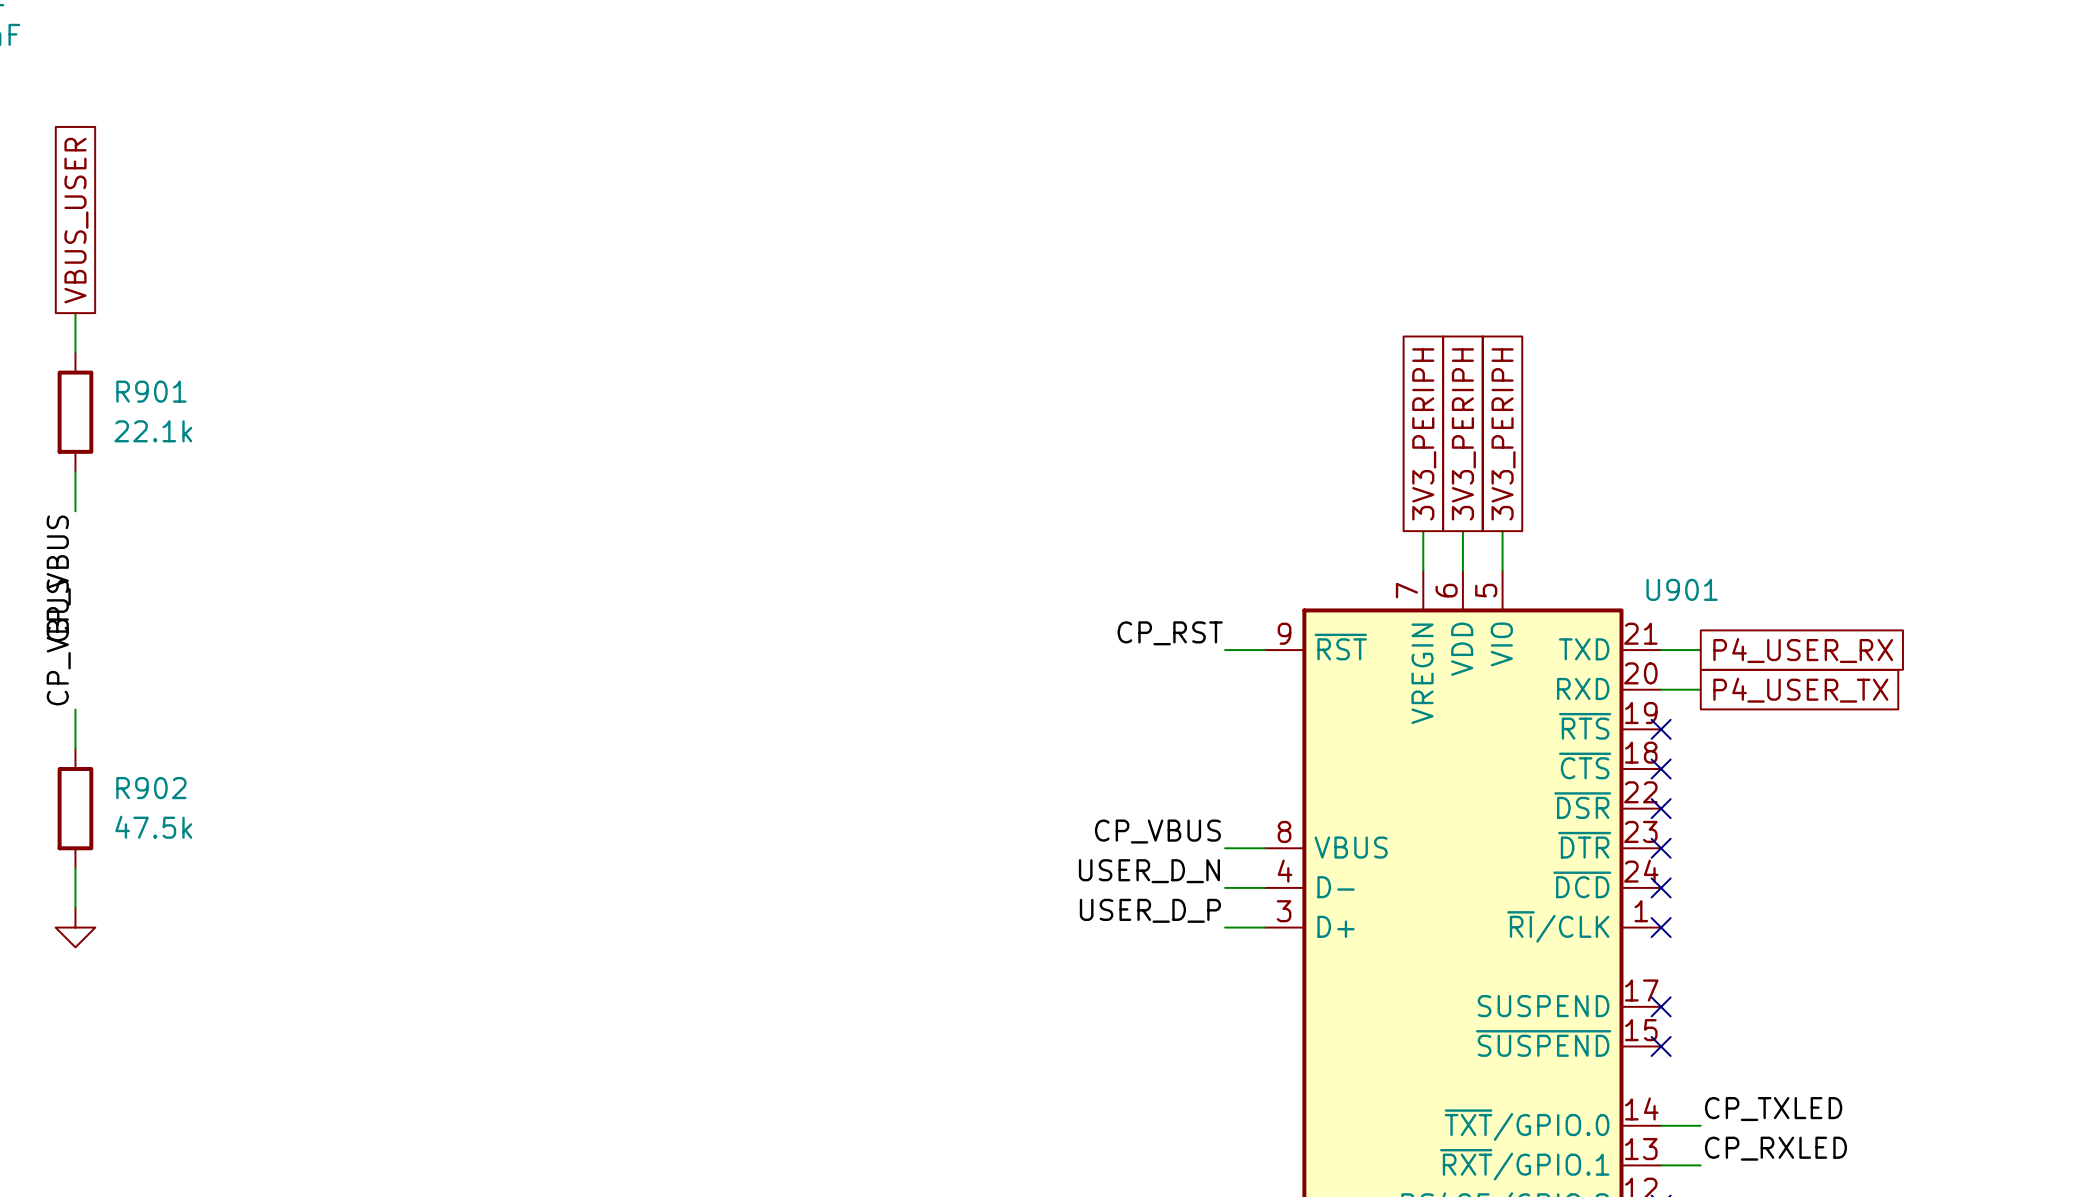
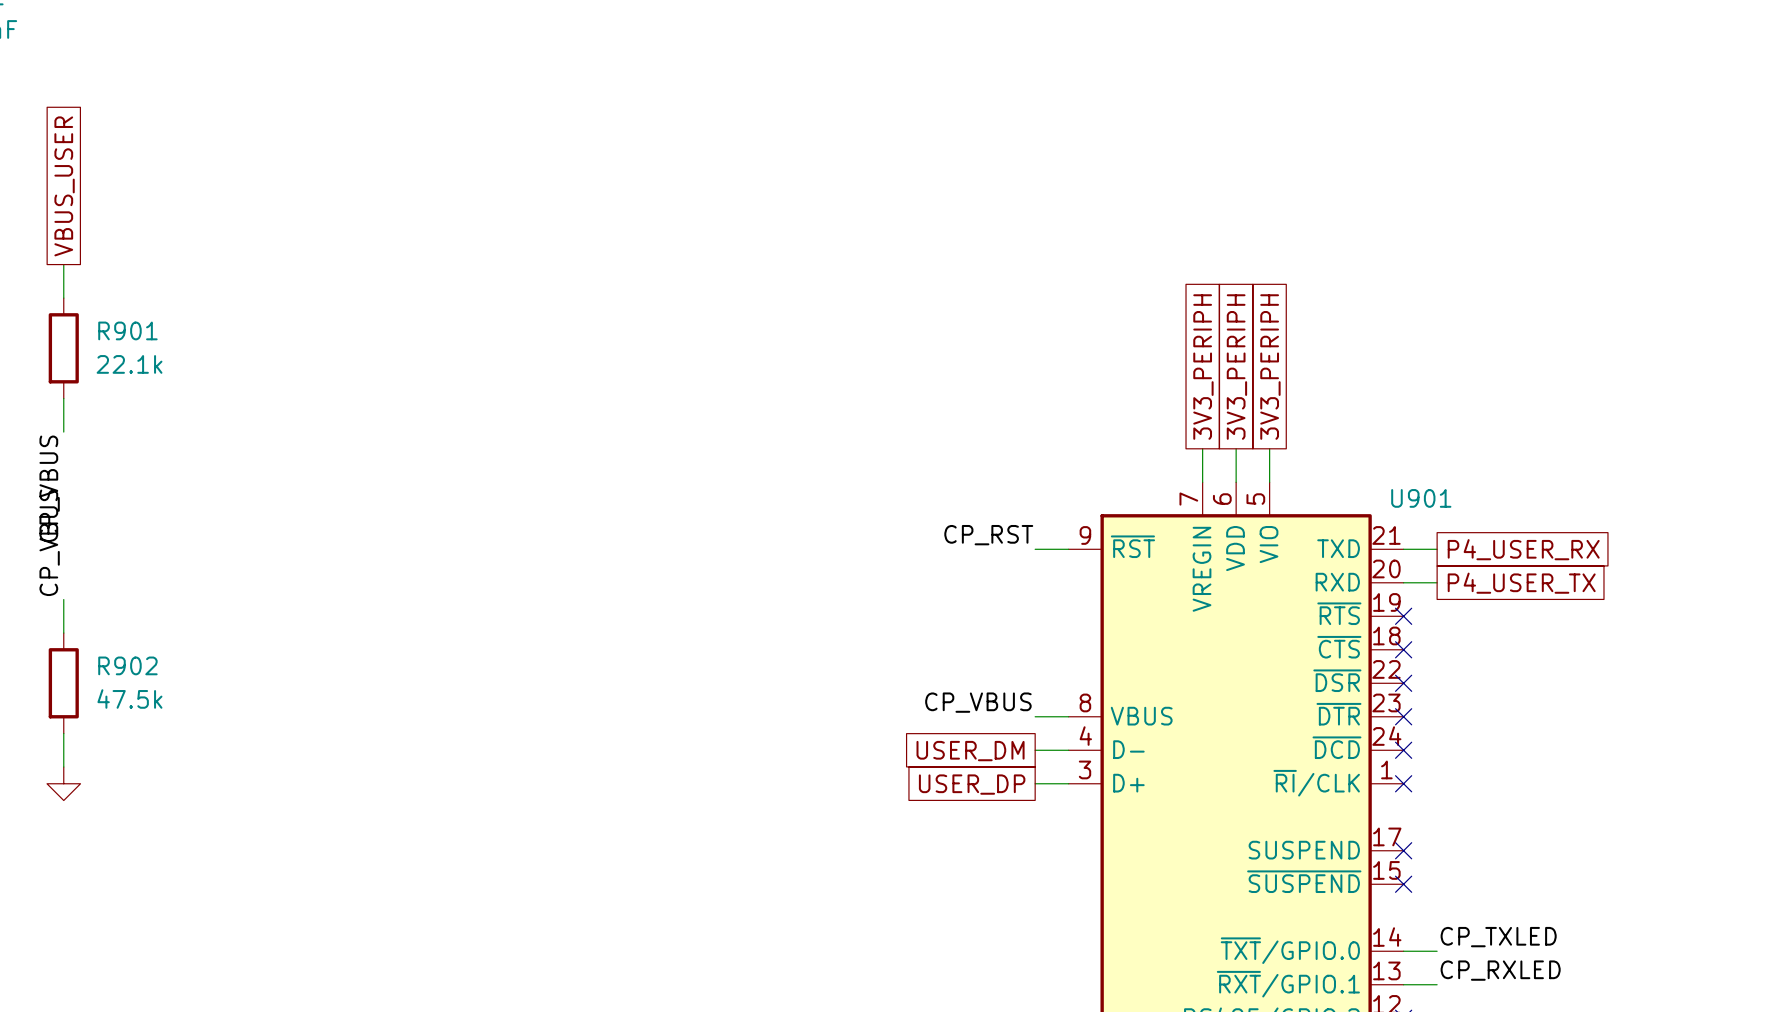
label: USER_D_N (1149, 871) -> none
global label: none -> USER_DM (970, 751)
label: USER_D_P (1150, 910) -> none
global label: none -> USER_DP (972, 784)

